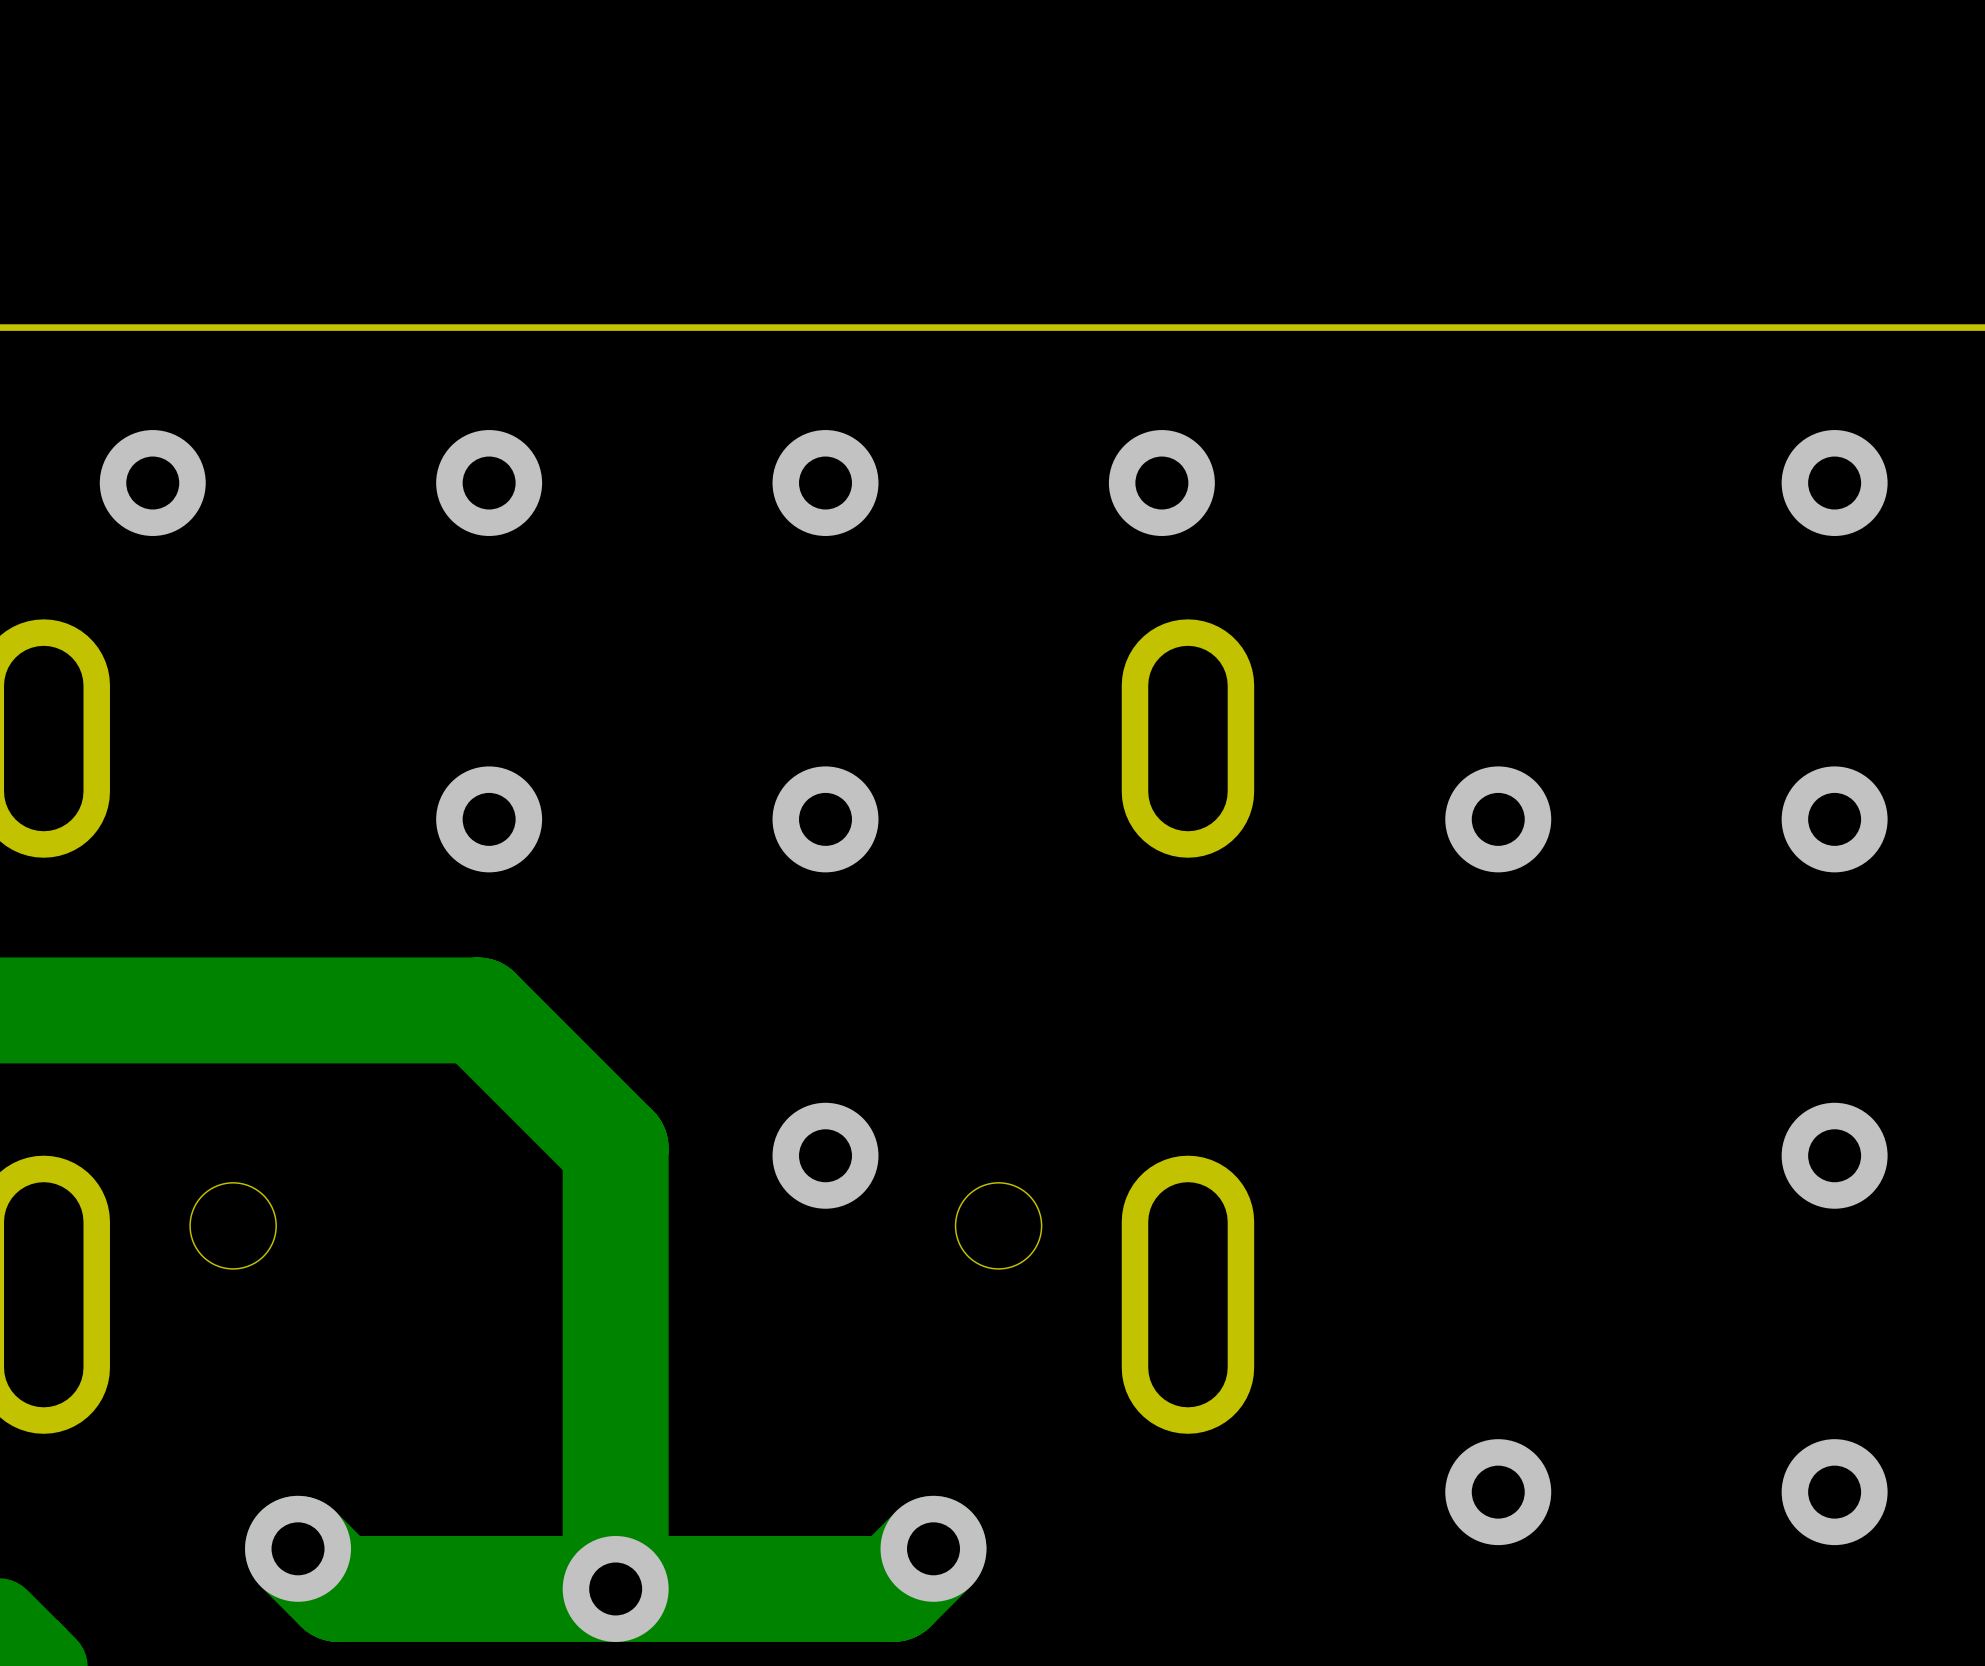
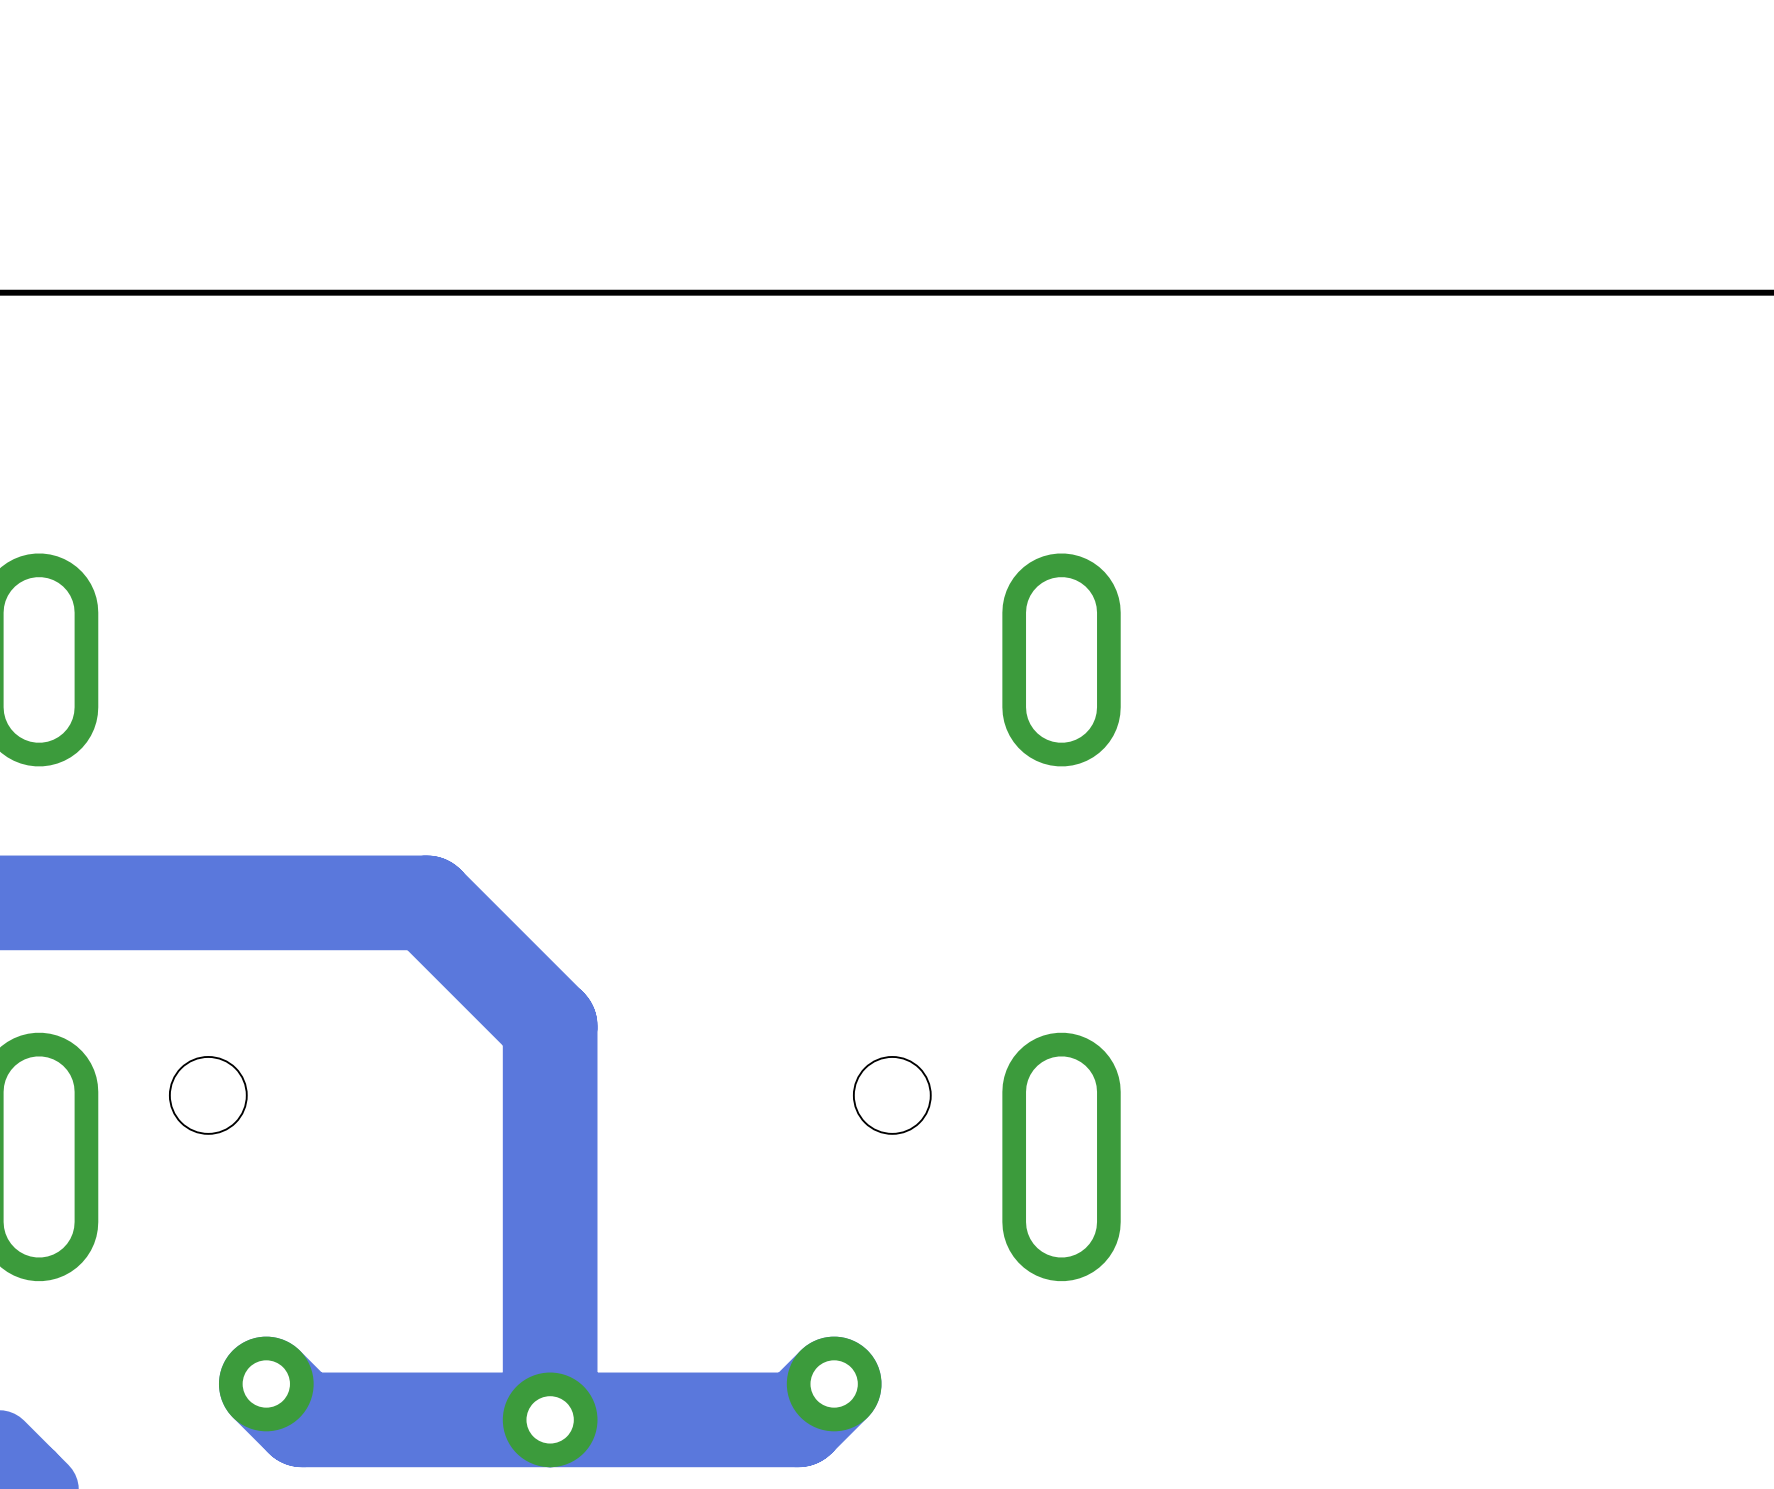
via: (152, 483) -> none
via: (489, 483) -> none
via: (825, 483) -> none
via: (1161, 483) -> none
via: (1834, 483) -> none
via: (489, 819) -> none
via: (825, 819) -> none
via: (1498, 819) -> none
via: (1834, 819) -> none
via: (825, 1155) -> none
via: (1834, 1155) -> none
via: (1498, 1492) -> none
via: (1834, 1492) -> none

